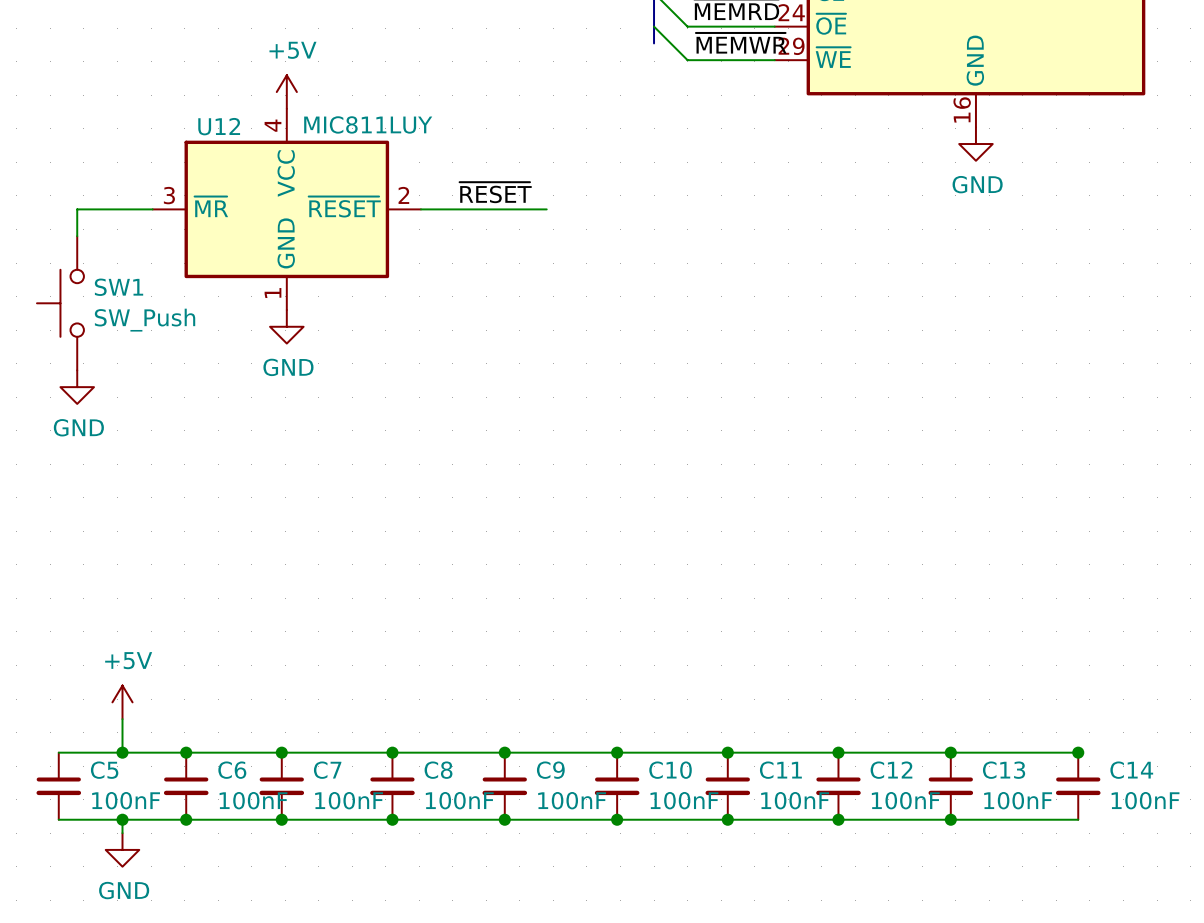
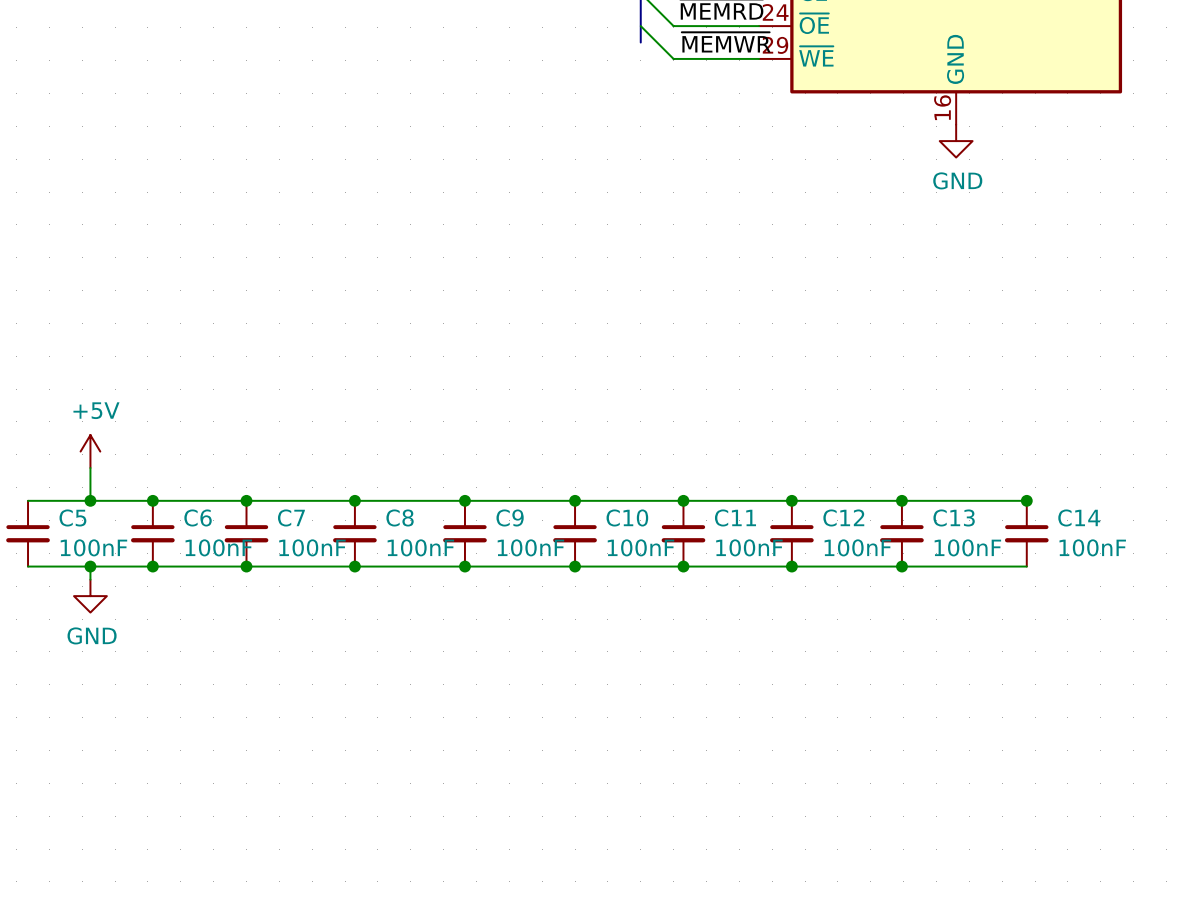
power symbol: +5V (286, 92) -> none
label: ~{RESET} (495, 192) -> none
wire: (152, 209) (77, 209) (77, 236) -> none
U12: MIC811LUY (286, 209) -> none
wire: (420, 209) (546, 209) -> none
SW1: SW_Push (60, 303) -> none
power symbol: GND (286, 326) -> none
power symbol: GND (77, 387) -> none
power symbol: none -> +5V (90, 451)
junction: none -> (90, 500)
junction: none -> (152, 500)
junction: none -> (246, 500)
junction: none -> (354, 500)
junction: none -> (464, 500)
junction: none -> (575, 500)
junction: none -> (683, 500)
junction: none -> (791, 500)
junction: none -> (901, 500)
junction: none -> (1026, 500)
junction: none -> (90, 566)
junction: none -> (152, 566)
junction: none -> (246, 566)
junction: none -> (354, 566)
junction: none -> (464, 566)
junction: none -> (575, 566)
junction: none -> (683, 566)
junction: none -> (791, 566)
junction: none -> (901, 566)
power symbol: none -> GND (90, 596)
power symbol: +5V (122, 702) -> none
wire: (122, 719) (122, 752) -> (90, 467) (90, 500)
wire: (58, 752) (1078, 752) (1078, 756) -> (28, 500) (1026, 500) (1026, 504)
junction: (122, 752) -> none
junction: (186, 752) -> none
junction: (281, 752) -> none
junction: (392, 752) -> none
junction: (504, 752) -> none
junction: (617, 752) -> none
junction: (727, 752) -> none
junction: (838, 752) -> none
junction: (950, 752) -> none
junction: (1078, 752) -> none
C5 position: (58, 786) -> (28, 533)
C6 position: (186, 786) -> (152, 533)
C7 position: (281, 786) -> (246, 533)
C8 position: (392, 786) -> (354, 533)
C9 position: (504, 786) -> (464, 533)
C10 position: (617, 786) -> (575, 533)
C11 position: (727, 786) -> (683, 533)
C12 position: (838, 786) -> (791, 533)
C13 position: (950, 786) -> (901, 533)
C14 position: (1078, 786) -> (1026, 533)
wire: (58, 819) (1078, 819) -> (28, 566) (1026, 566)
wire: (122, 819) (122, 833) -> (90, 566) (90, 579)
junction: (122, 819) -> none
junction: (186, 819) -> none
junction: (281, 819) -> none
junction: (392, 819) -> none
junction: (504, 819) -> none
junction: (617, 819) -> none
junction: (727, 819) -> none
junction: (838, 819) -> none
junction: (950, 819) -> none
power symbol: GND (122, 849) -> none

